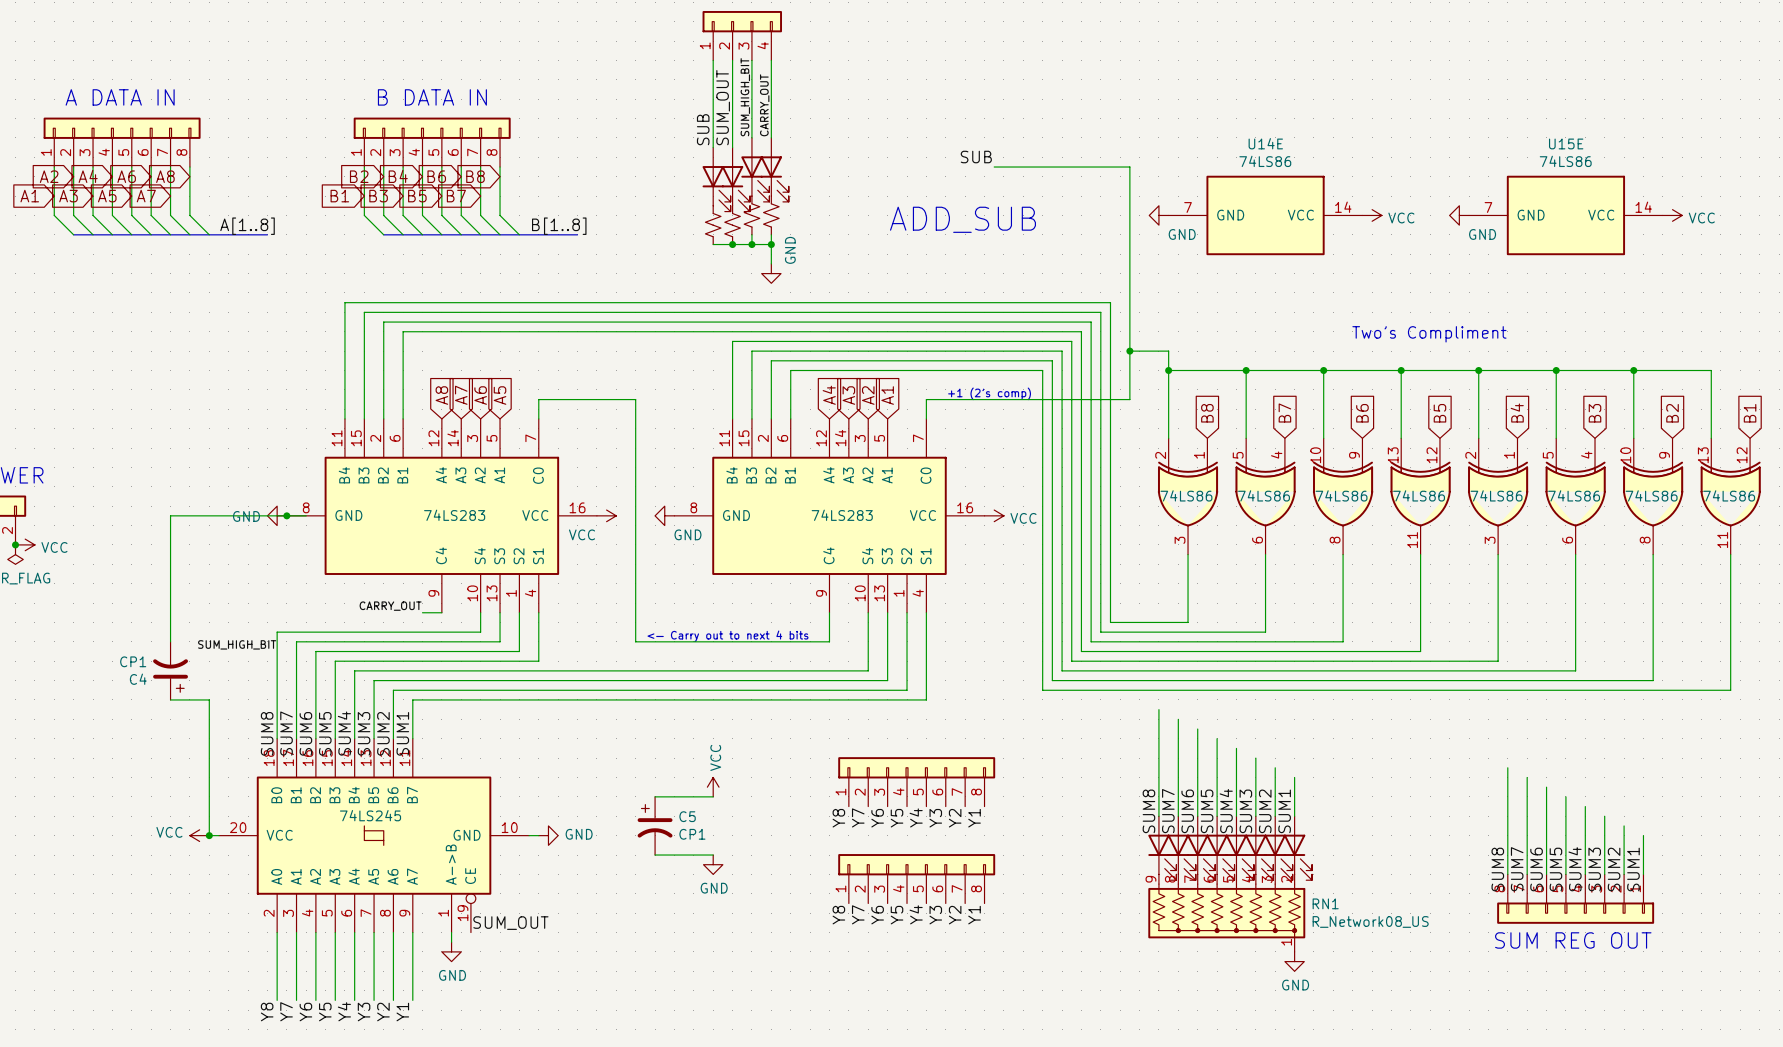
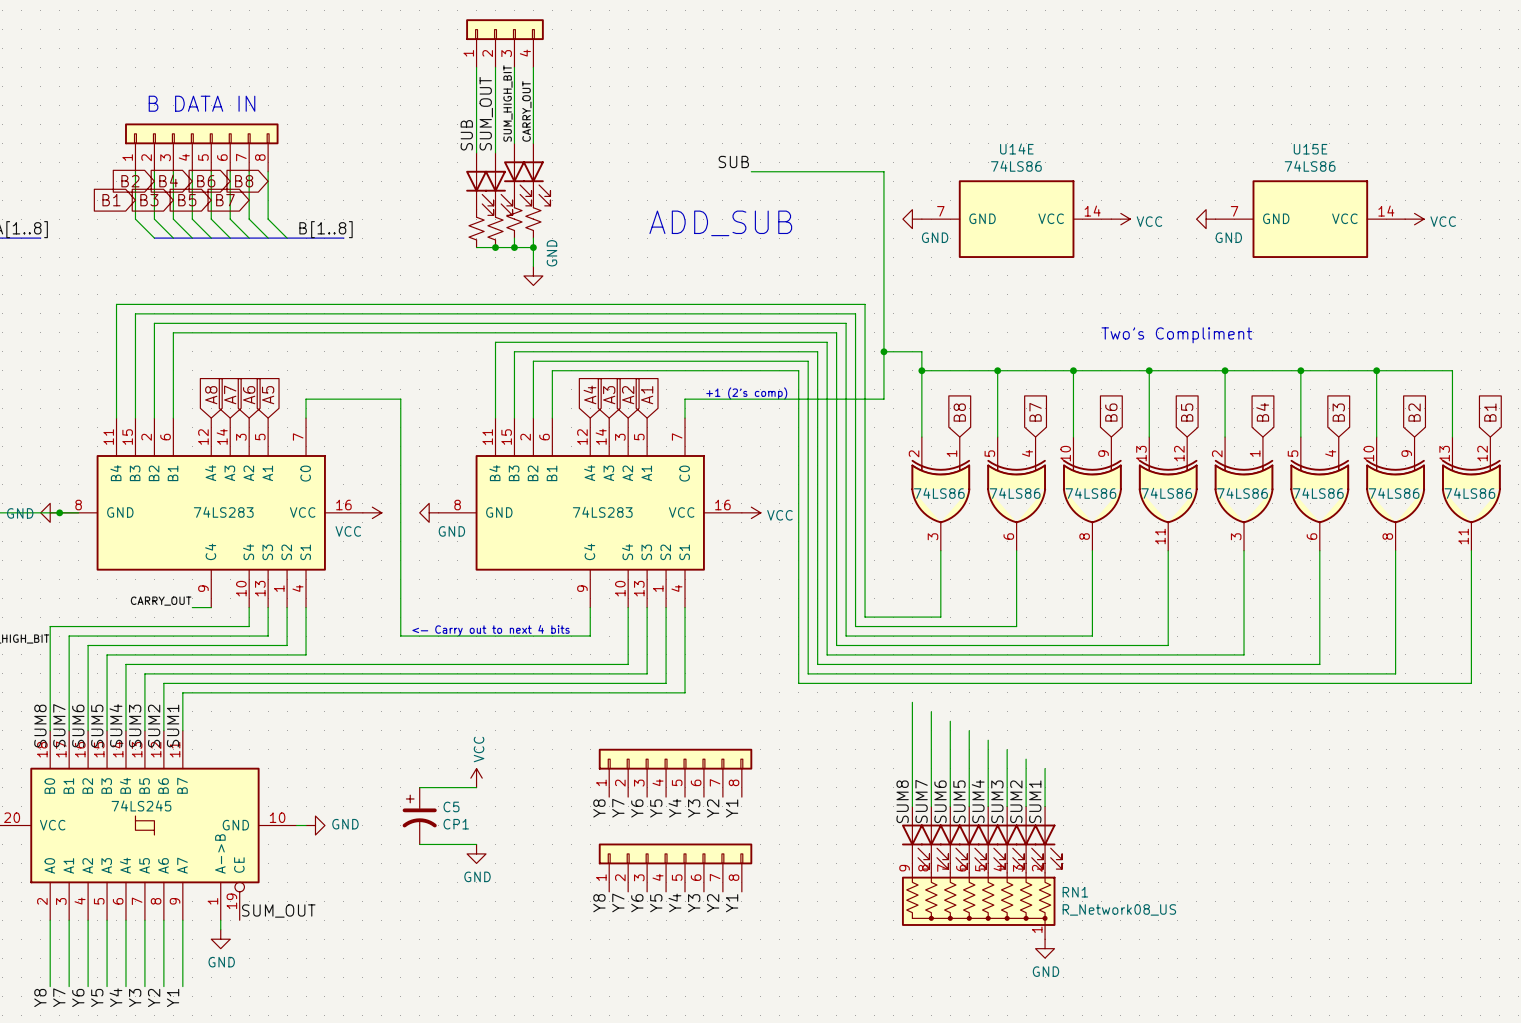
wire: (1507, 767) (1507, 874) -> none
wire: (1527, 777) (1527, 874) -> none
wire: (1546, 787) (1546, 874) -> none
wire: (1565, 796) (1565, 874) -> none
wire: (1585, 806) (1585, 874) -> none
wire: (1604, 816) (1604, 874) -> none
wire: (1624, 825) (1624, 874) -> none
wire: (1643, 835) (1643, 874) -> none
label: SUM8 (1497, 869) -> none
label: SUM7 (1517, 869) -> none
label: SUM6 (1536, 869) -> none
label: SUM5 (1555, 869) -> none
label: SUM4 (1575, 869) -> none
label: SUM3 (1594, 869) -> none
label: SUM2 (1614, 869) -> none
label: SUM1 (1633, 869) -> none
part: (1575, 899) -> none
text: SUM REG OUT (1573, 940) -> none

